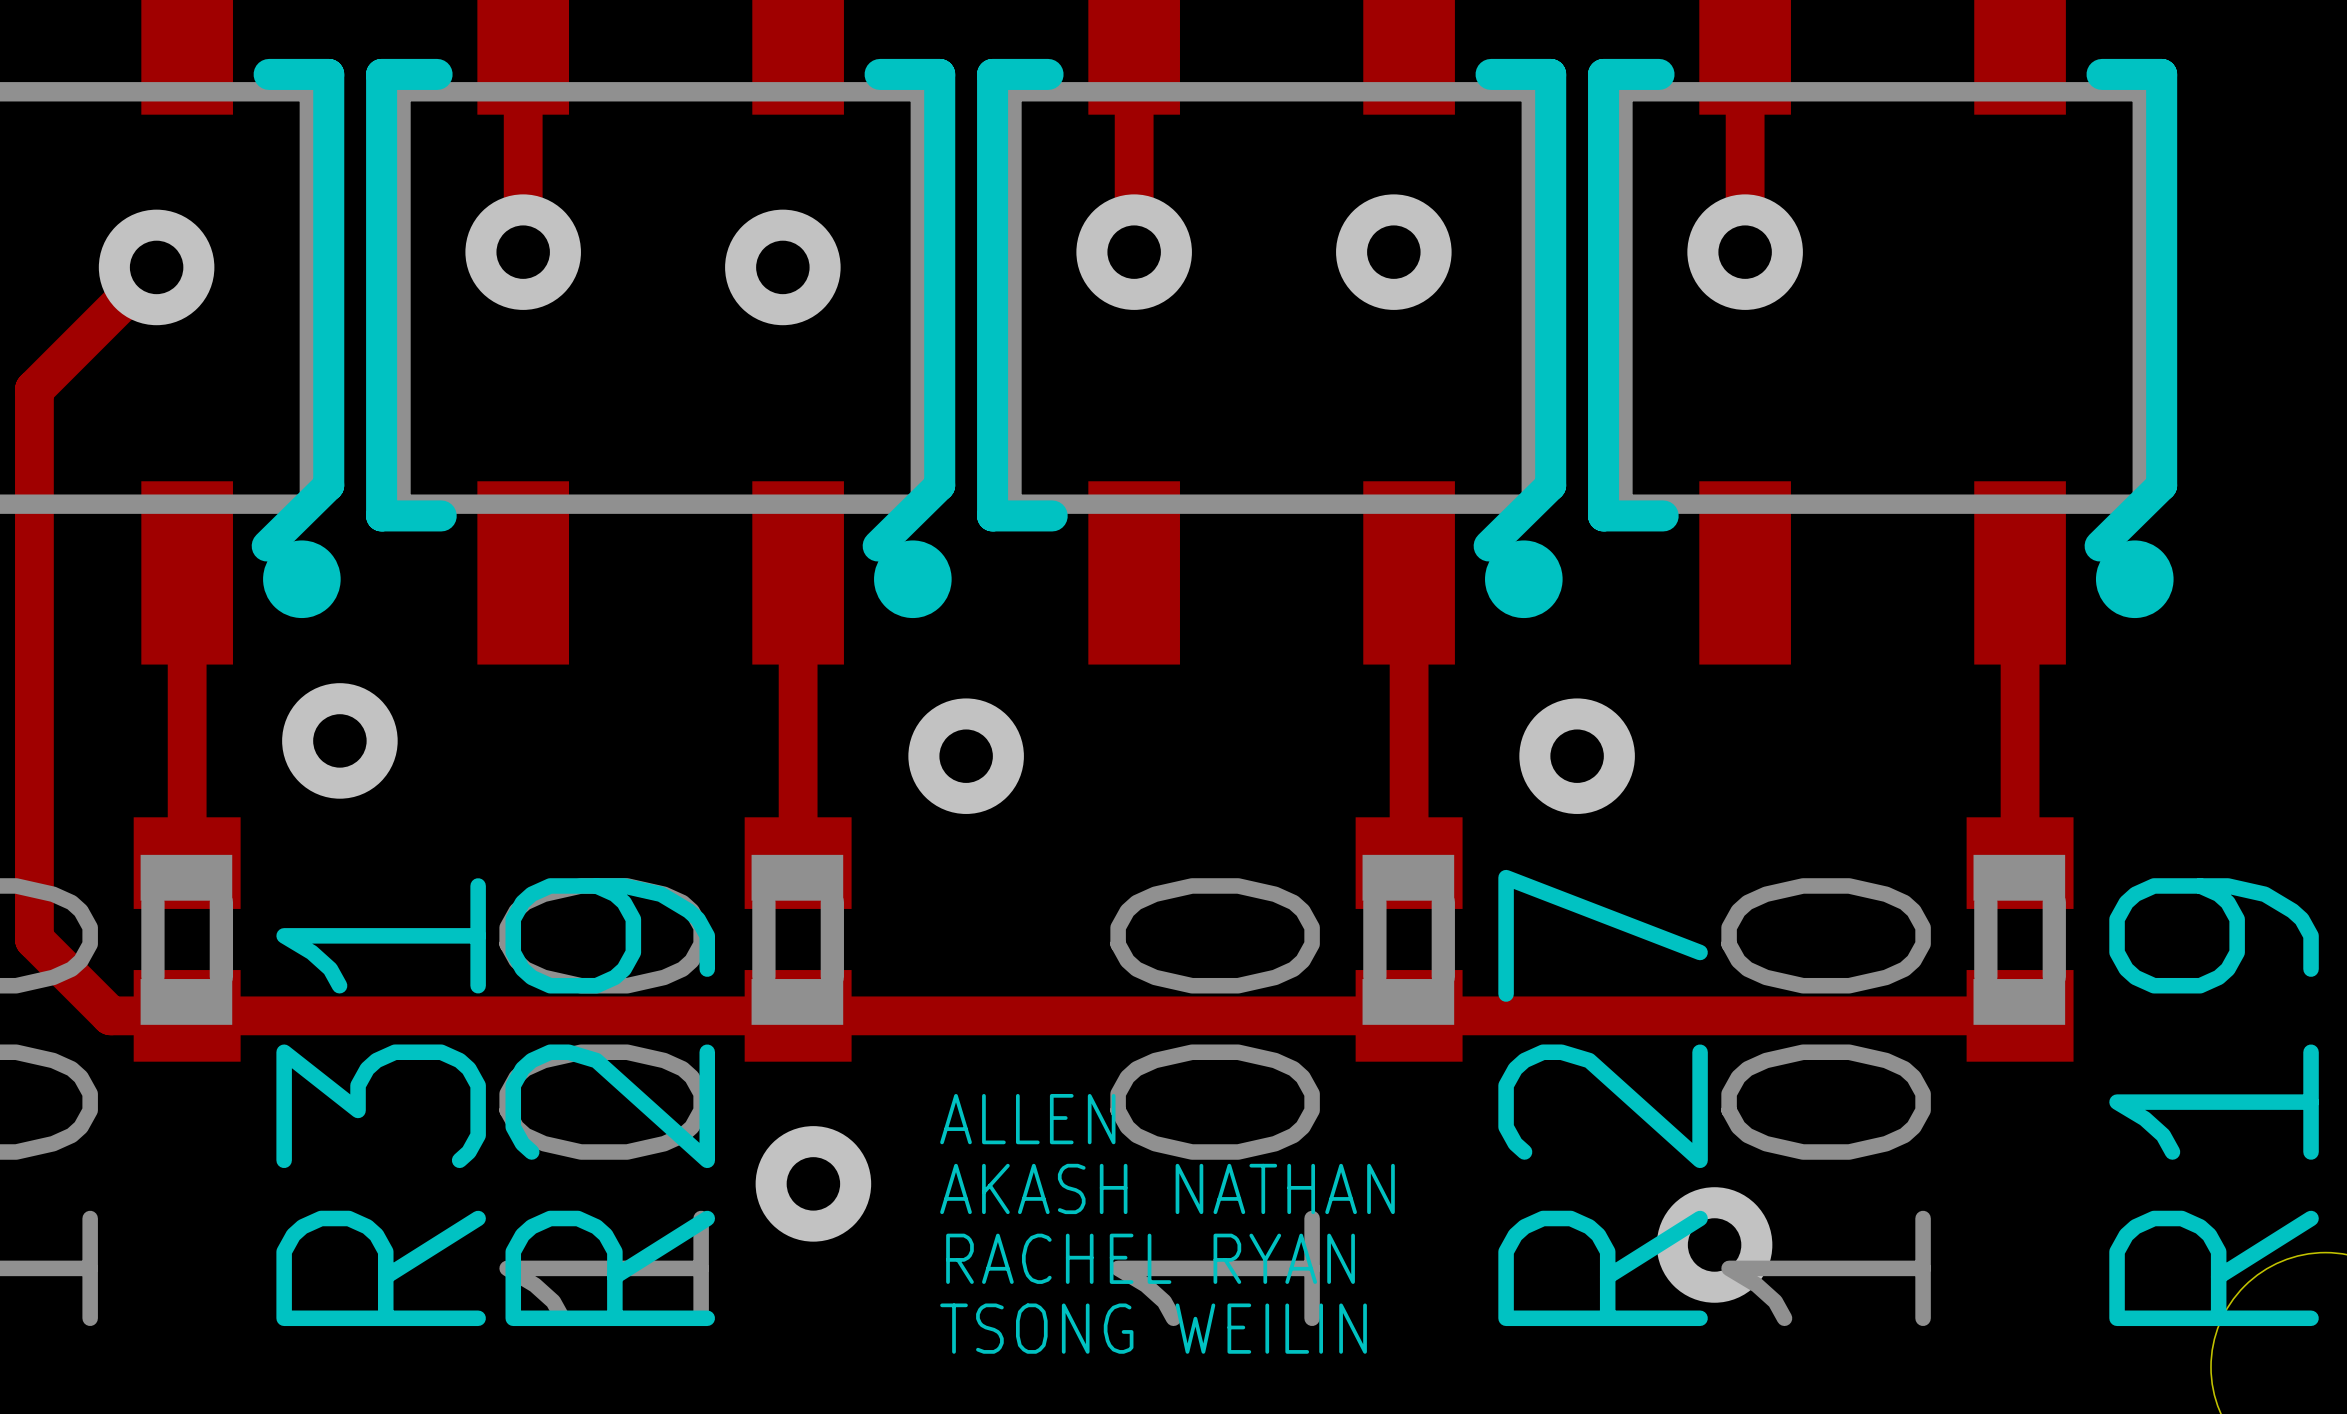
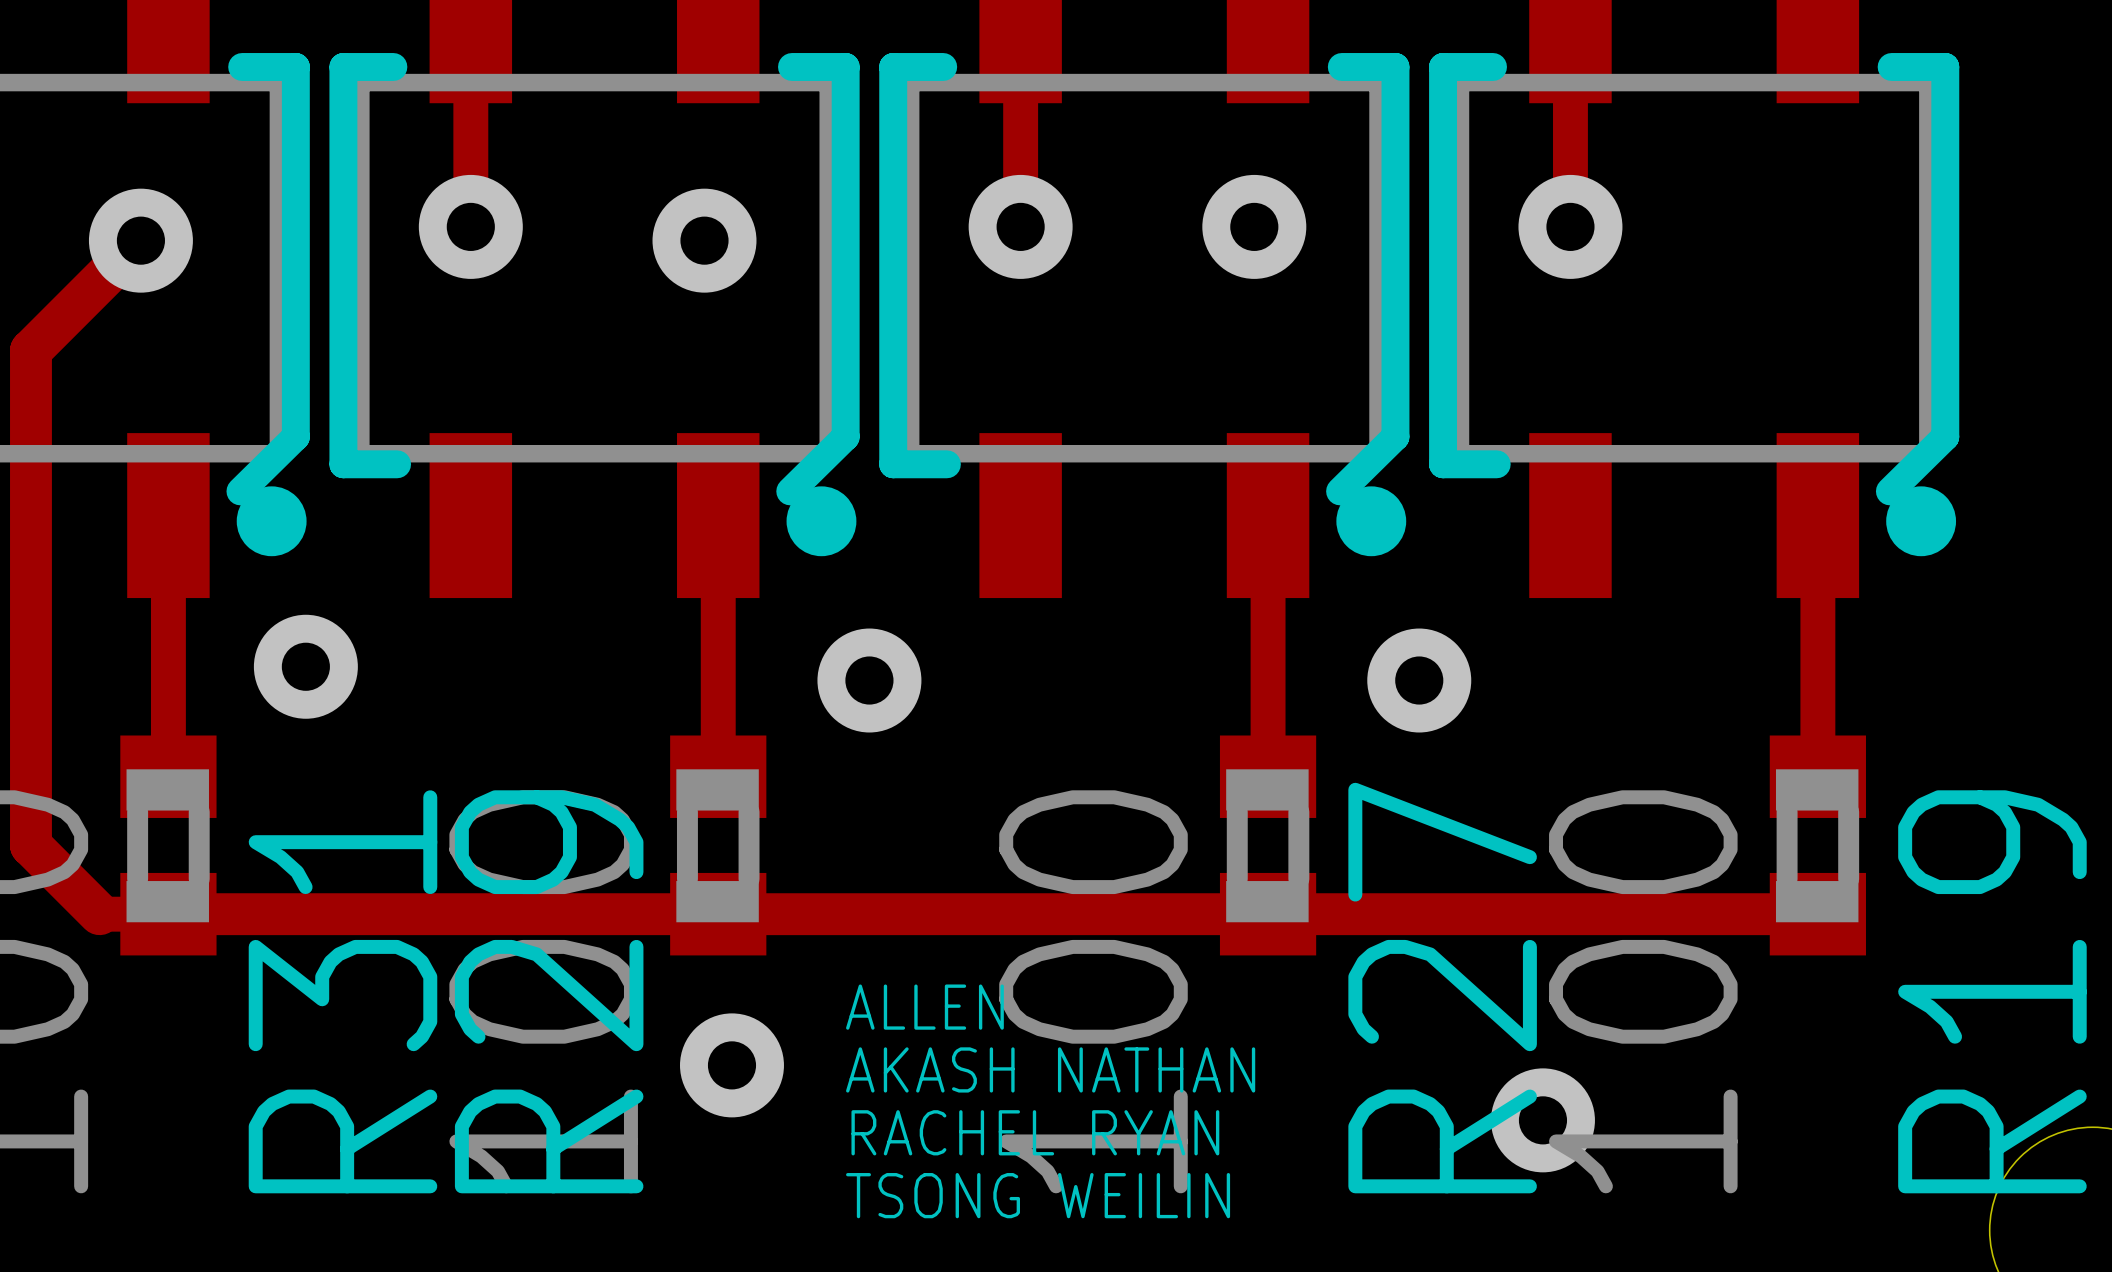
track width: thin (156, 267) (34, 389) (34, 939) (110, 1015) -> thick (140, 240) (30, 350) (30, 845) (99, 914)
track width: thin (187, 1015) (2020, 1015) -> thick (168, 914) (1817, 914)

